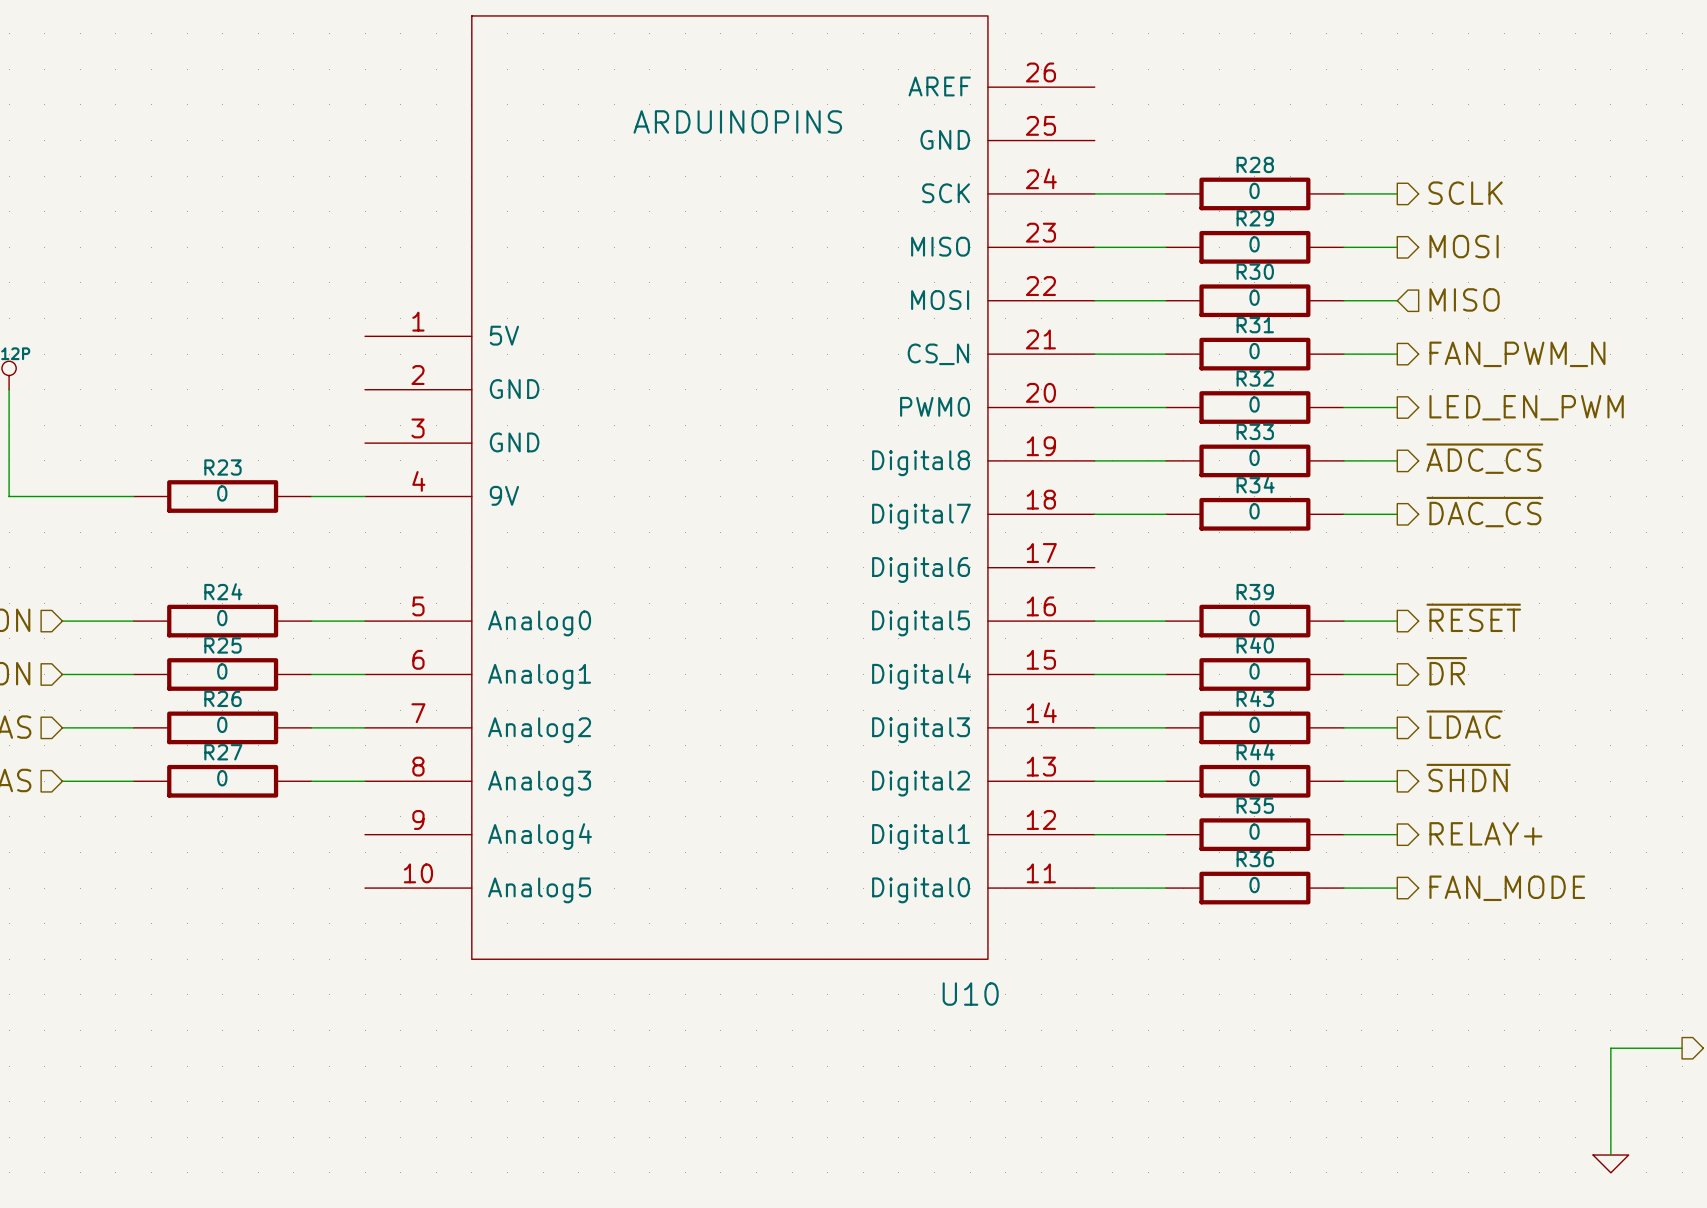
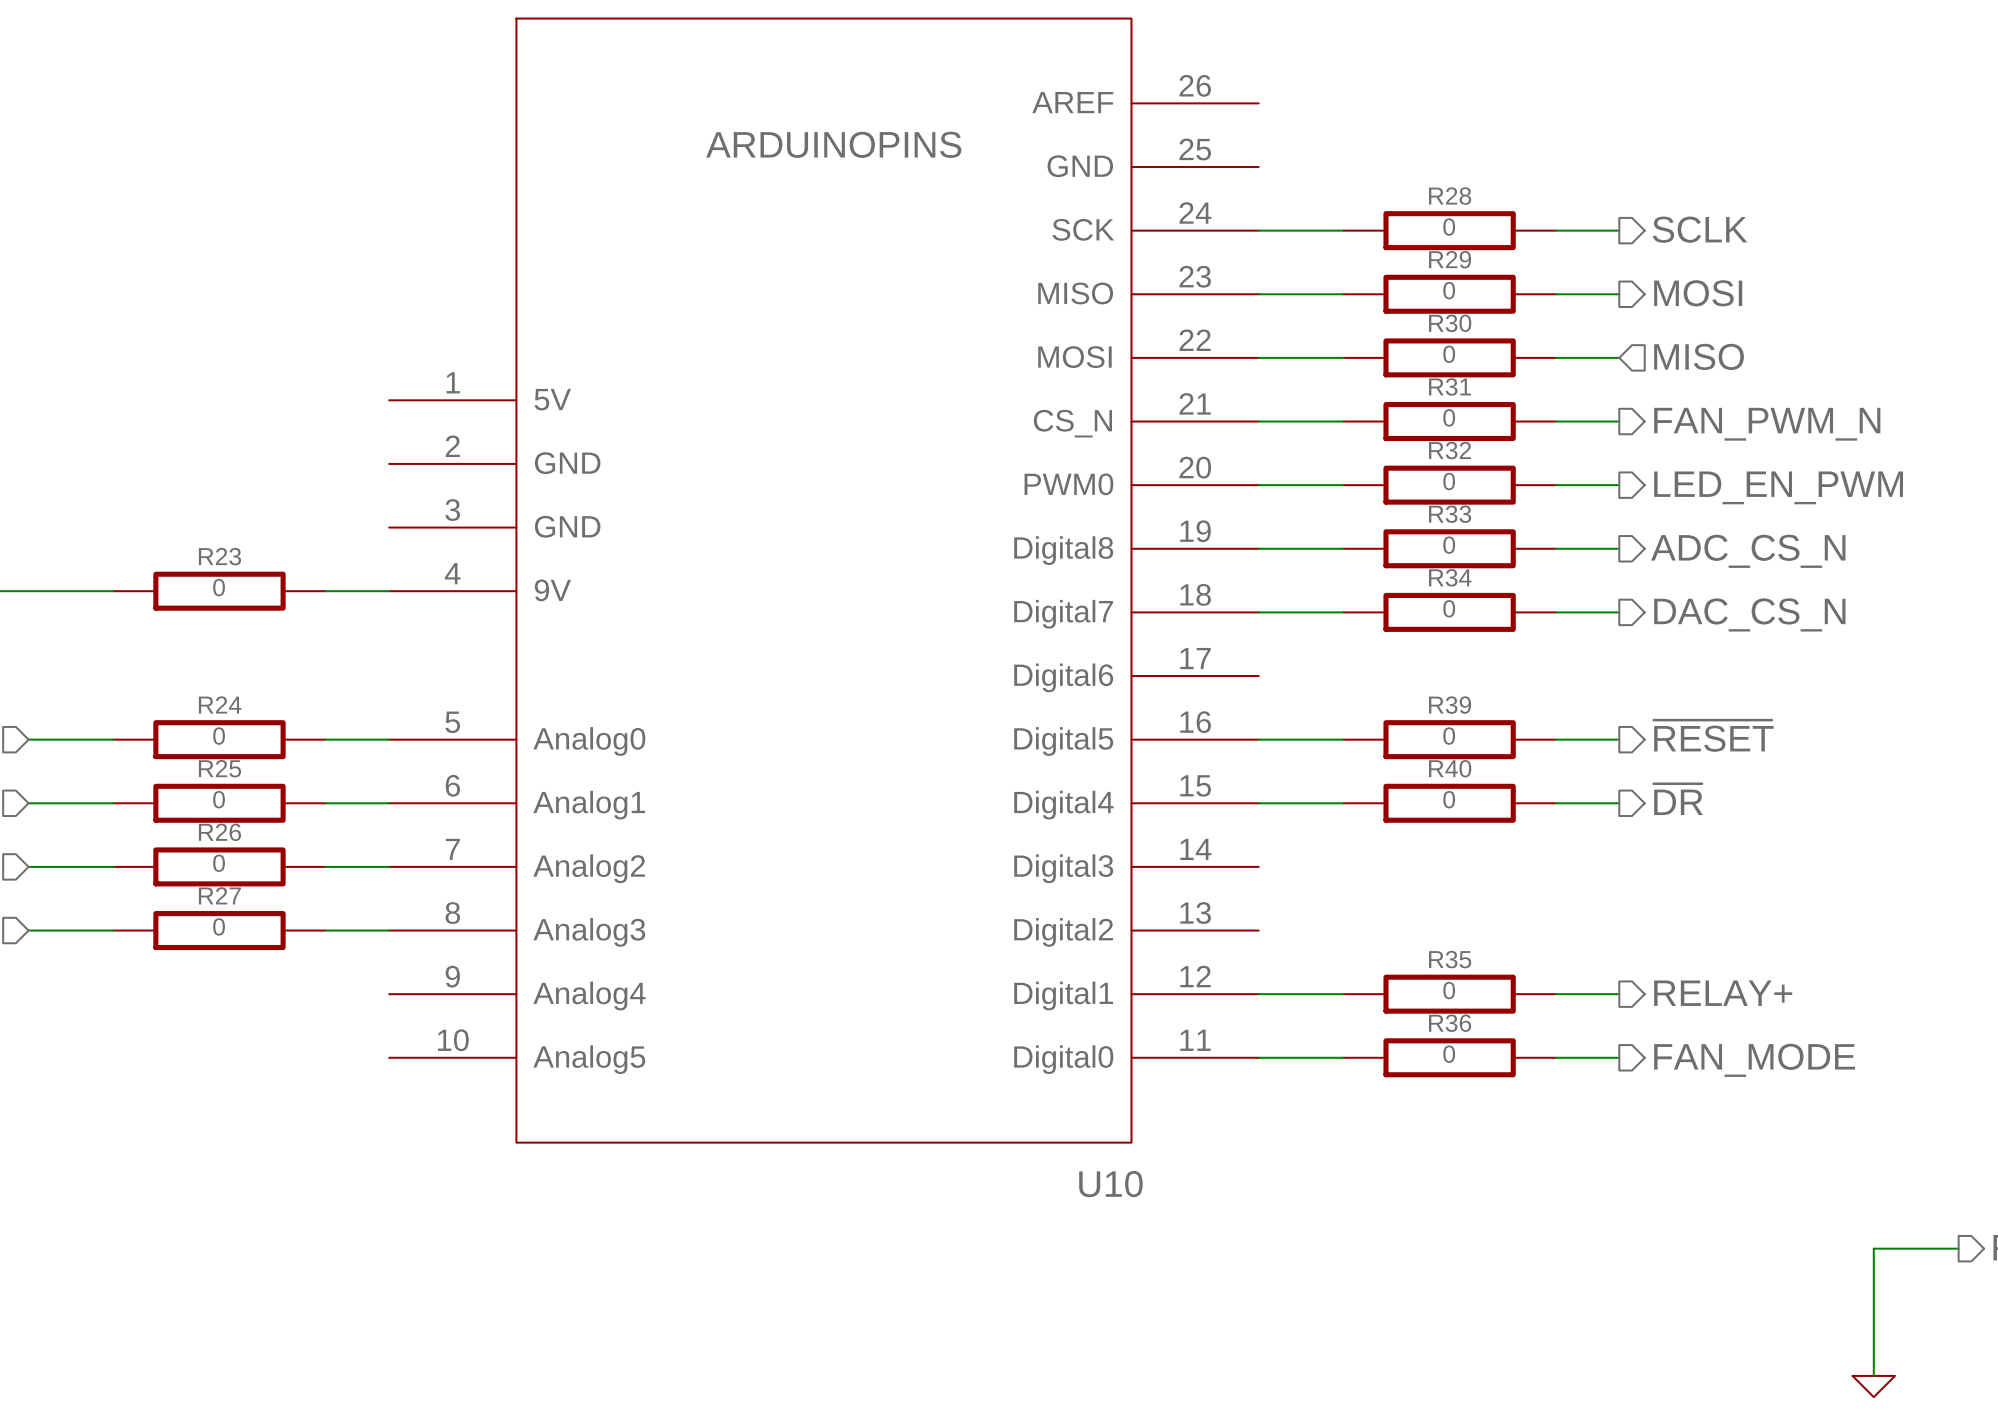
hierarchical label: ~{ADC_CS} (1484, 458) -> ADC_CS_N (1748, 551)
hierarchical label: ~{DAC_CS} (1484, 512) -> DAC_CS_N (1749, 614)
hierarchical label: ~{LDAC} (1464, 724) -> none
wire: (1094, 727) (1165, 727) -> none
R43: 0 (1254, 727) -> none
wire: (1343, 727) (1397, 727) -> none
hierarchical label: ~{SHDN} (1468, 778) -> none
wire: (1094, 781) (1165, 781) -> none
R44: 0 (1254, 781) -> none
wire: (1343, 781) (1397, 781) -> none

